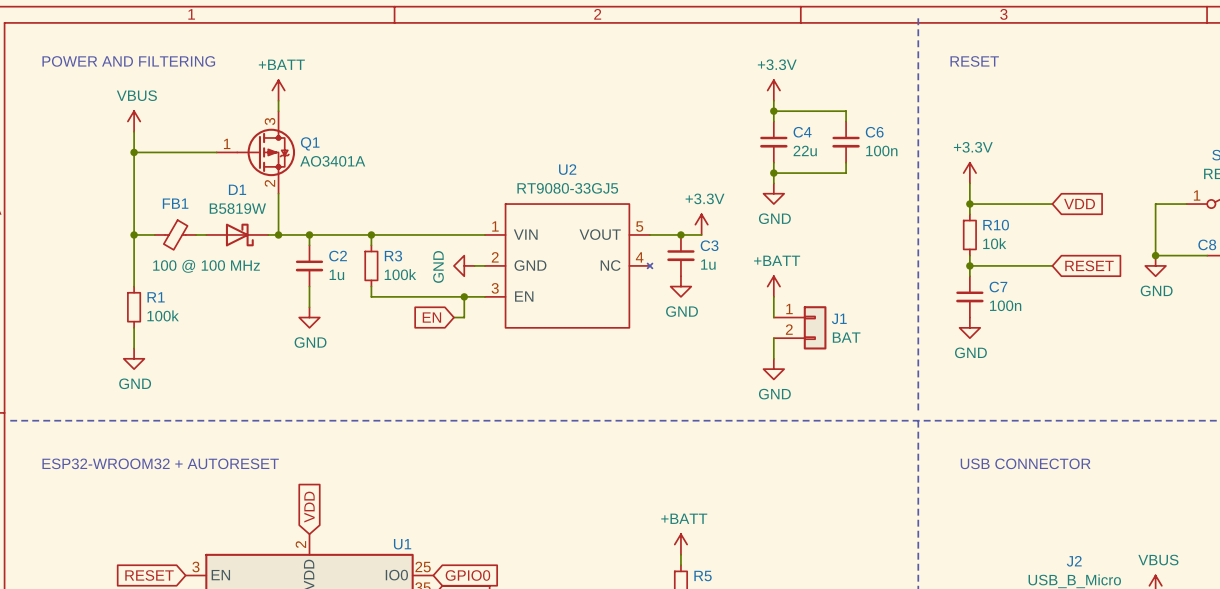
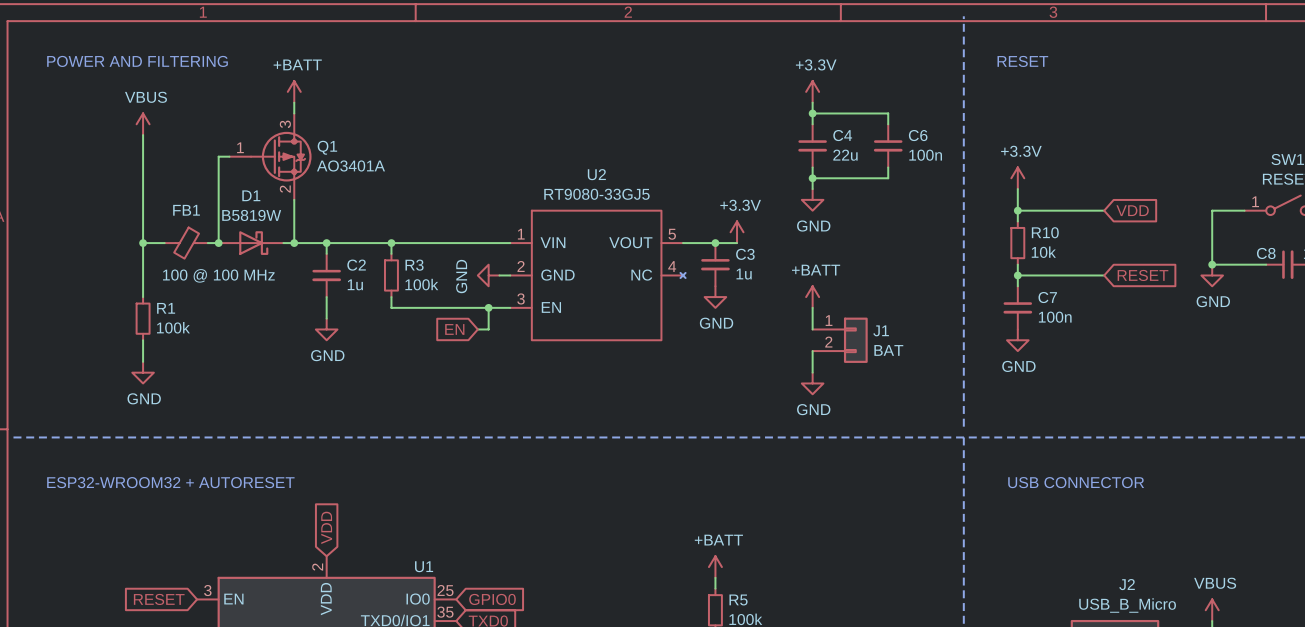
wire: (134, 152) (206, 152) -> (218, 243) (218, 156)
junction: (134, 152) -> none
junction: none -> (218, 243)

